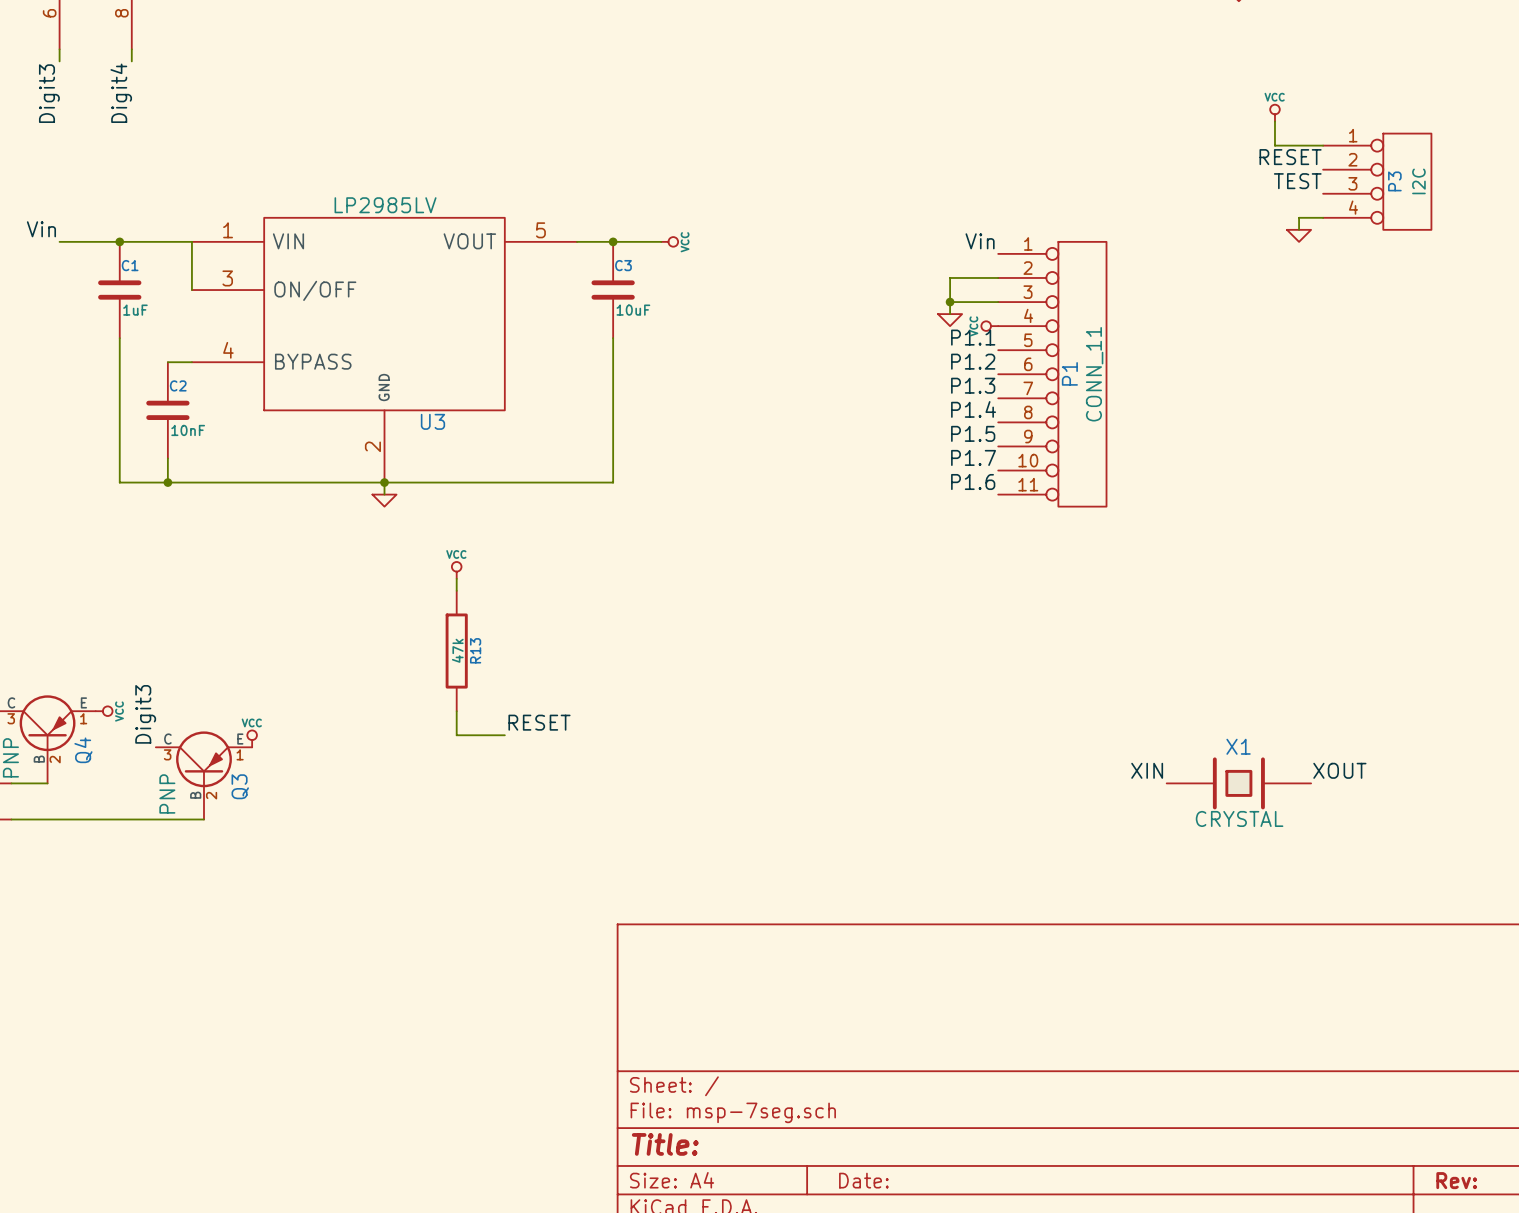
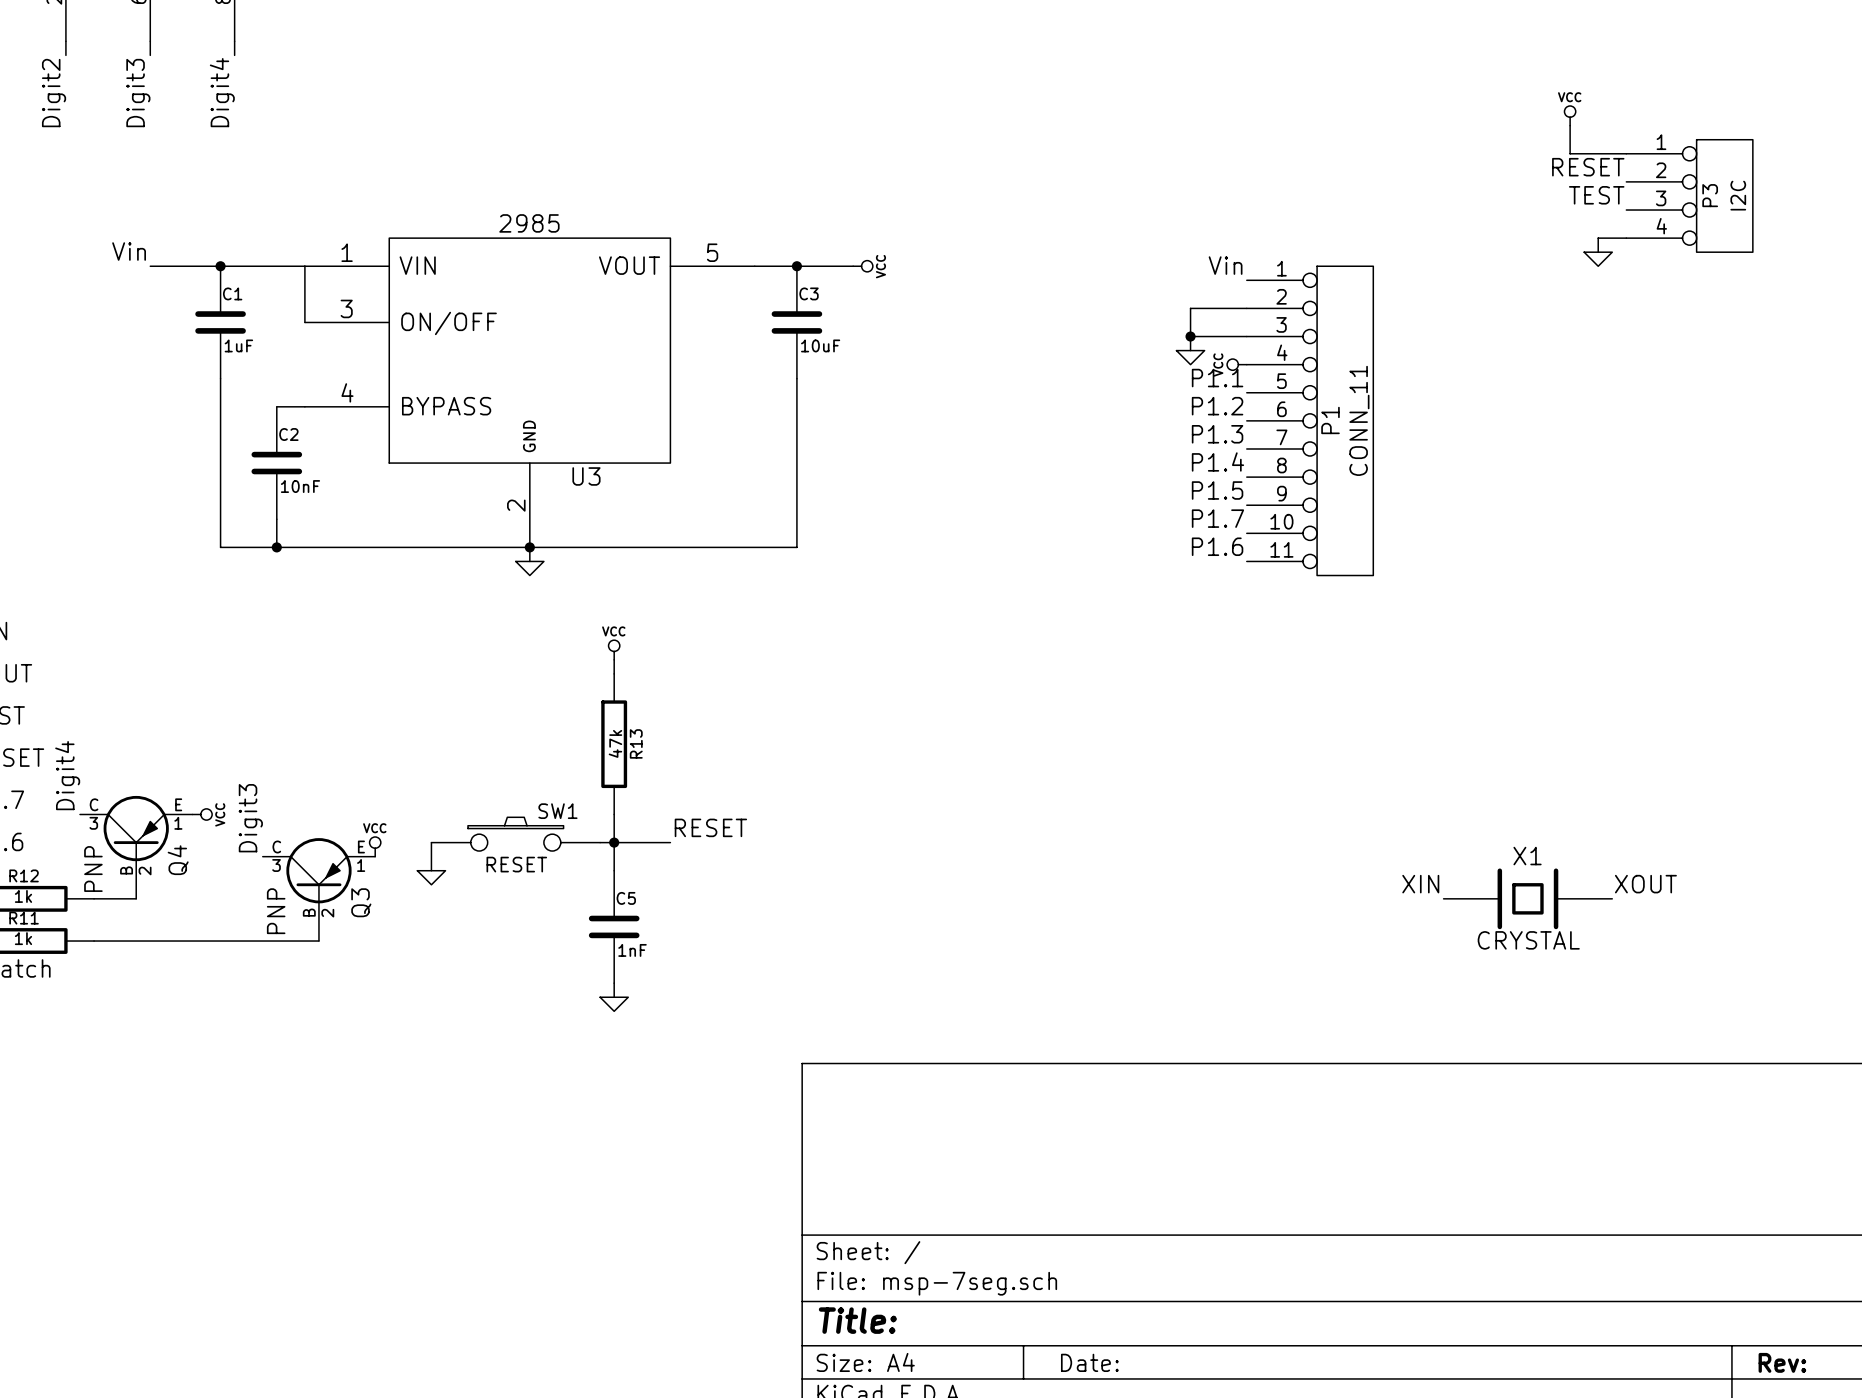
U3 value: LP2985LV (385, 205) -> 2985 (529, 223)
SW1: none -> RESET (515, 834)
wire: none -> (431, 842) (431, 870)
wire: none -> (600, 842) (614, 842) (614, 870)
junction: none -> (614, 842)
power symbol: none -> (431, 877)
C5: none -> 1nF (614, 926)
wire: none -> (614, 983) (614, 997)
power symbol: none -> (614, 1004)

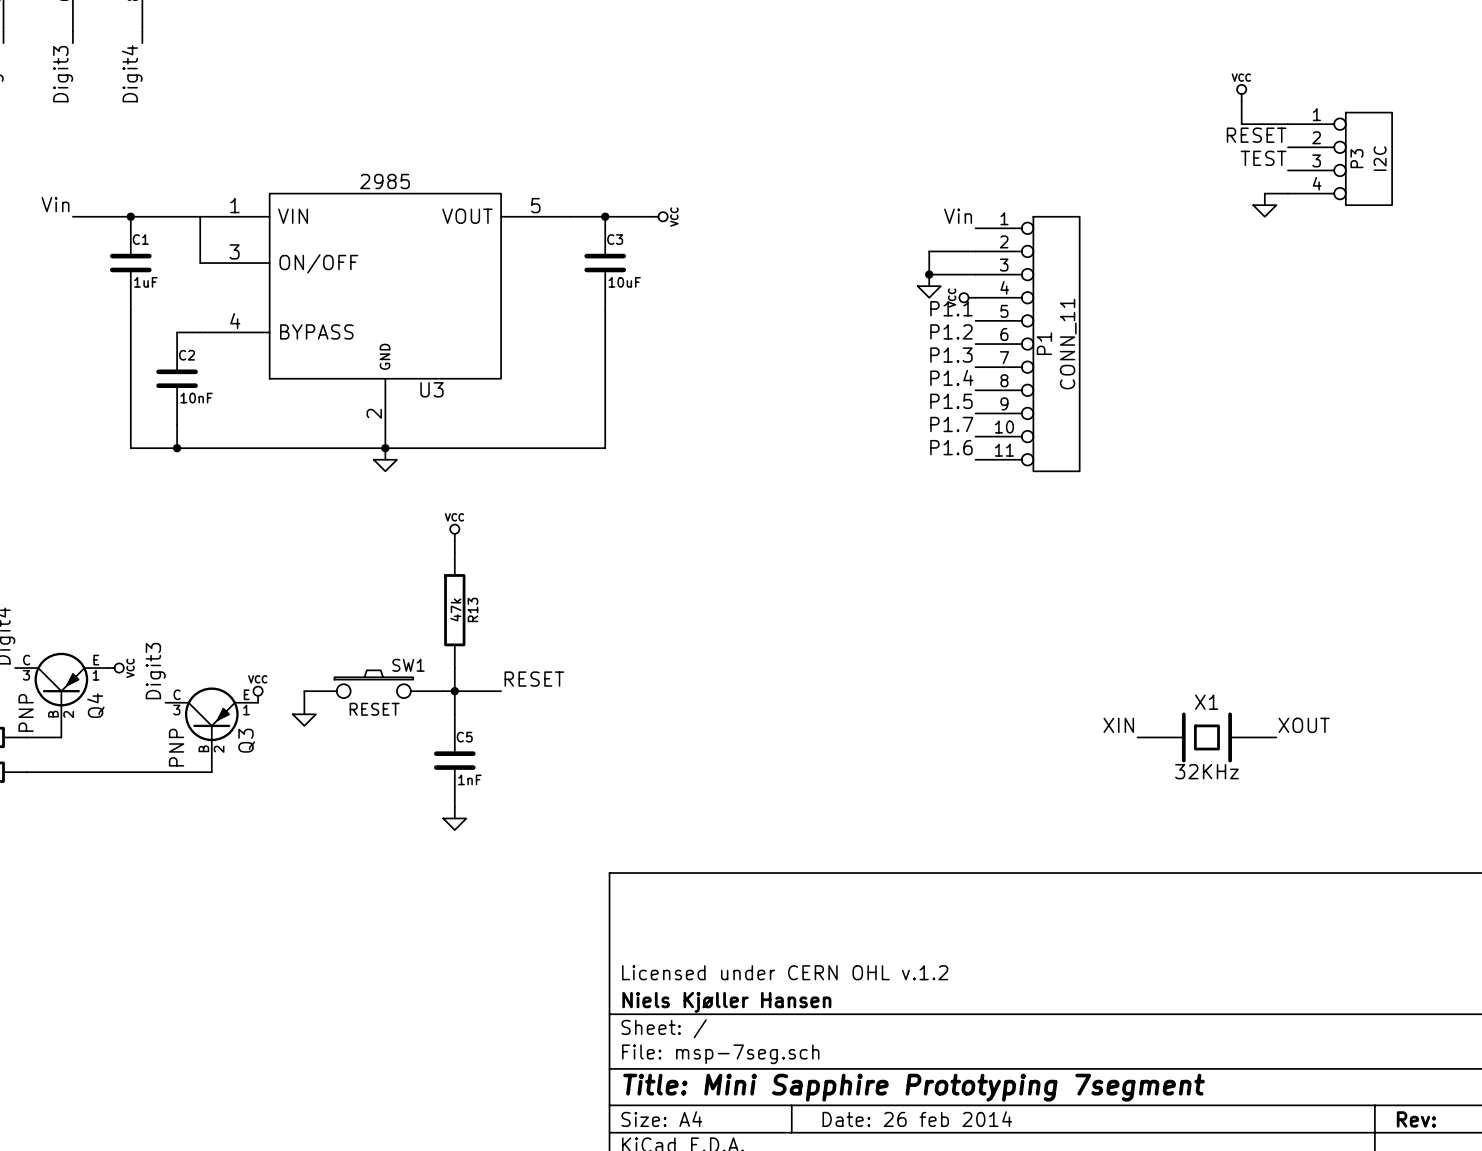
X1 value: CRYSTAL (1528, 940) -> 32KHz (1206, 771)
title block: none -> Licensed under CERN OHL v.1.2 (785, 972)
title block: none -> Niels Kjøller Hansen (726, 1002)
title block: Title: (857, 1320) -> Title: Mini Sapphire Prototyping 7segment (914, 1087)
title block: Date: (1089, 1362) -> Date: 26 feb 2014 (917, 1119)

